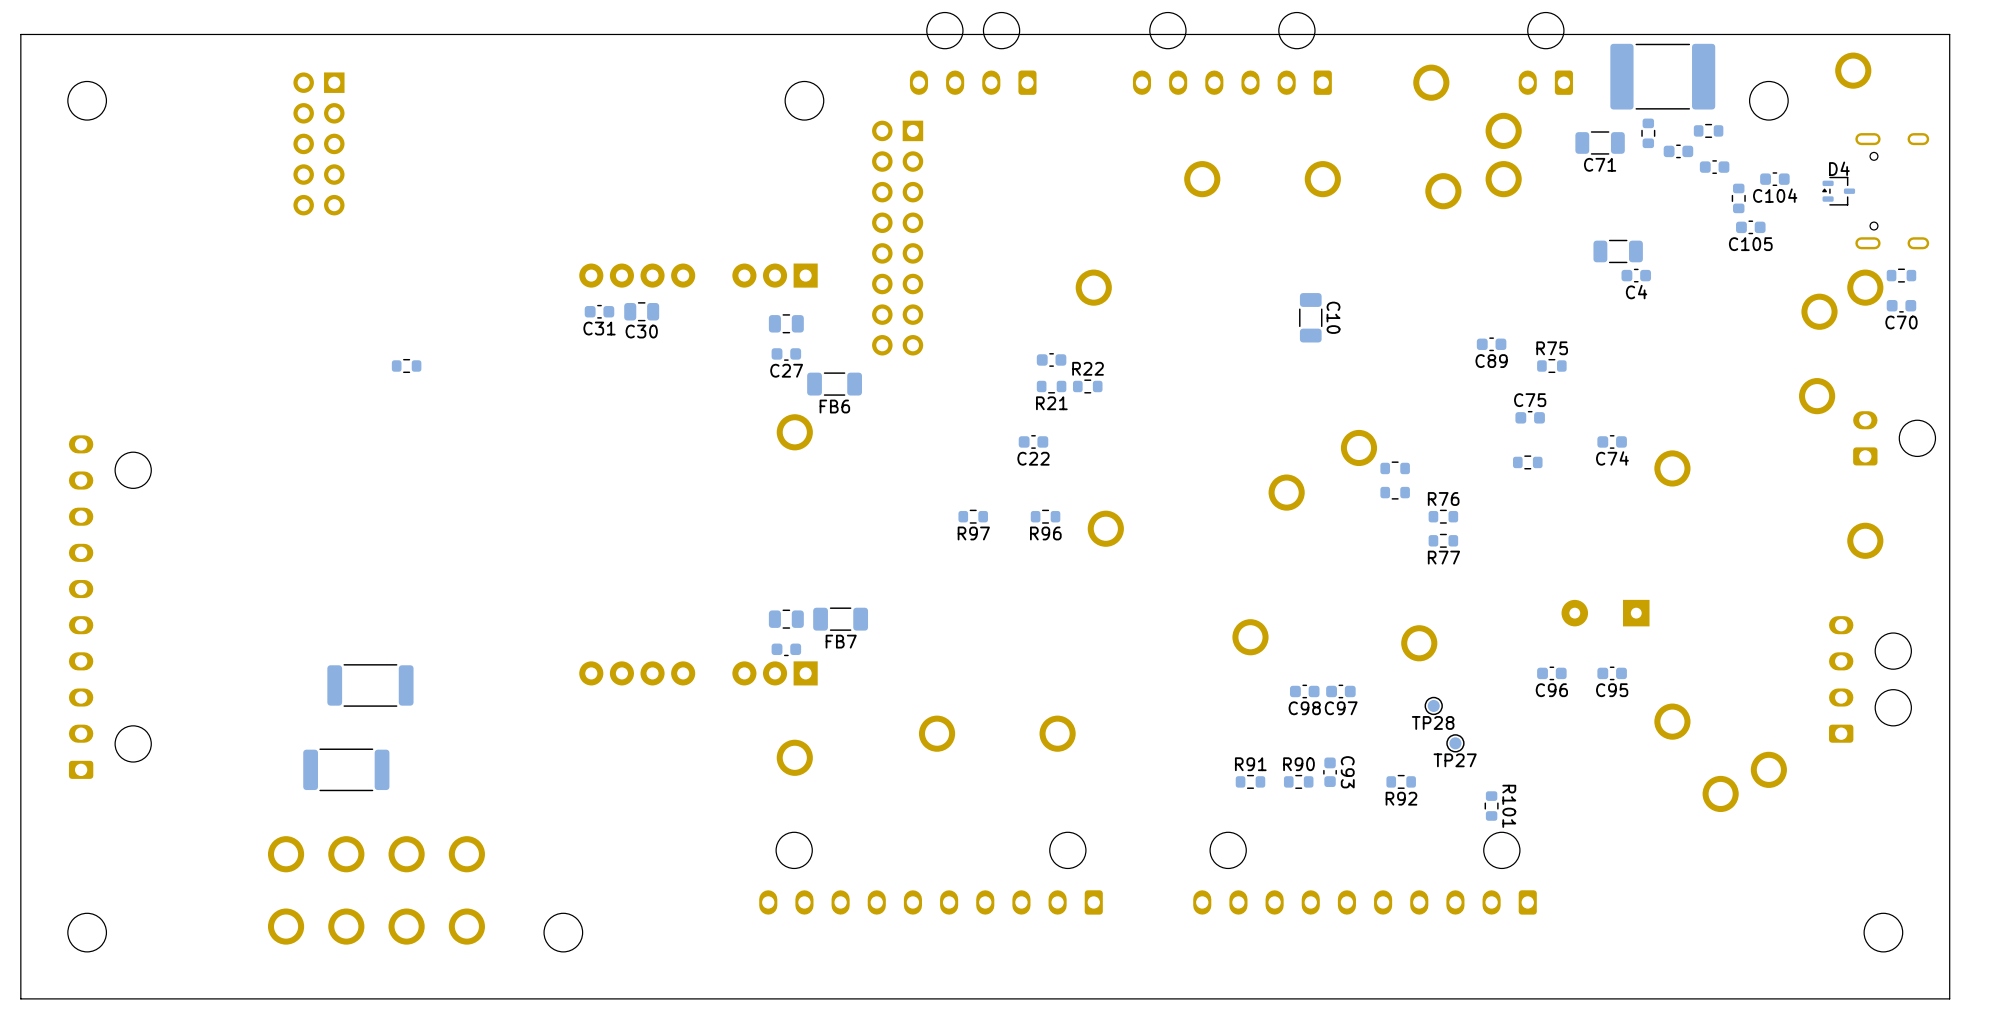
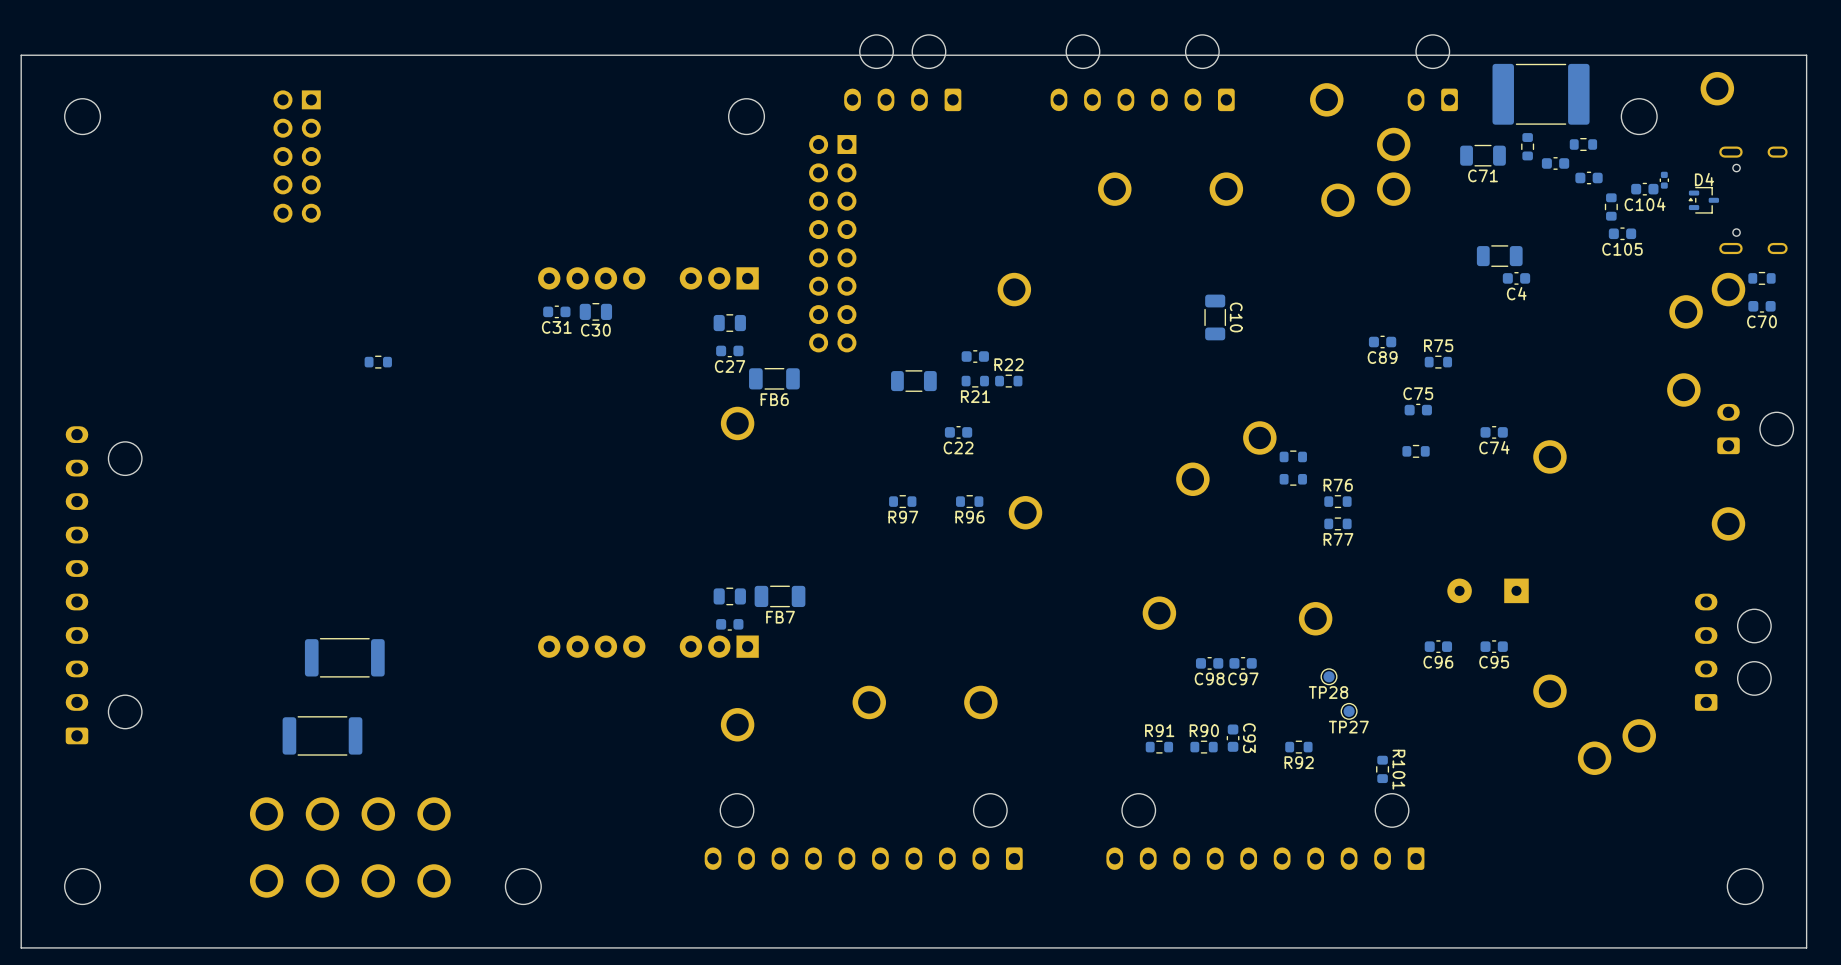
part: none -> (1664, 180)
part: none -> (913, 381)

